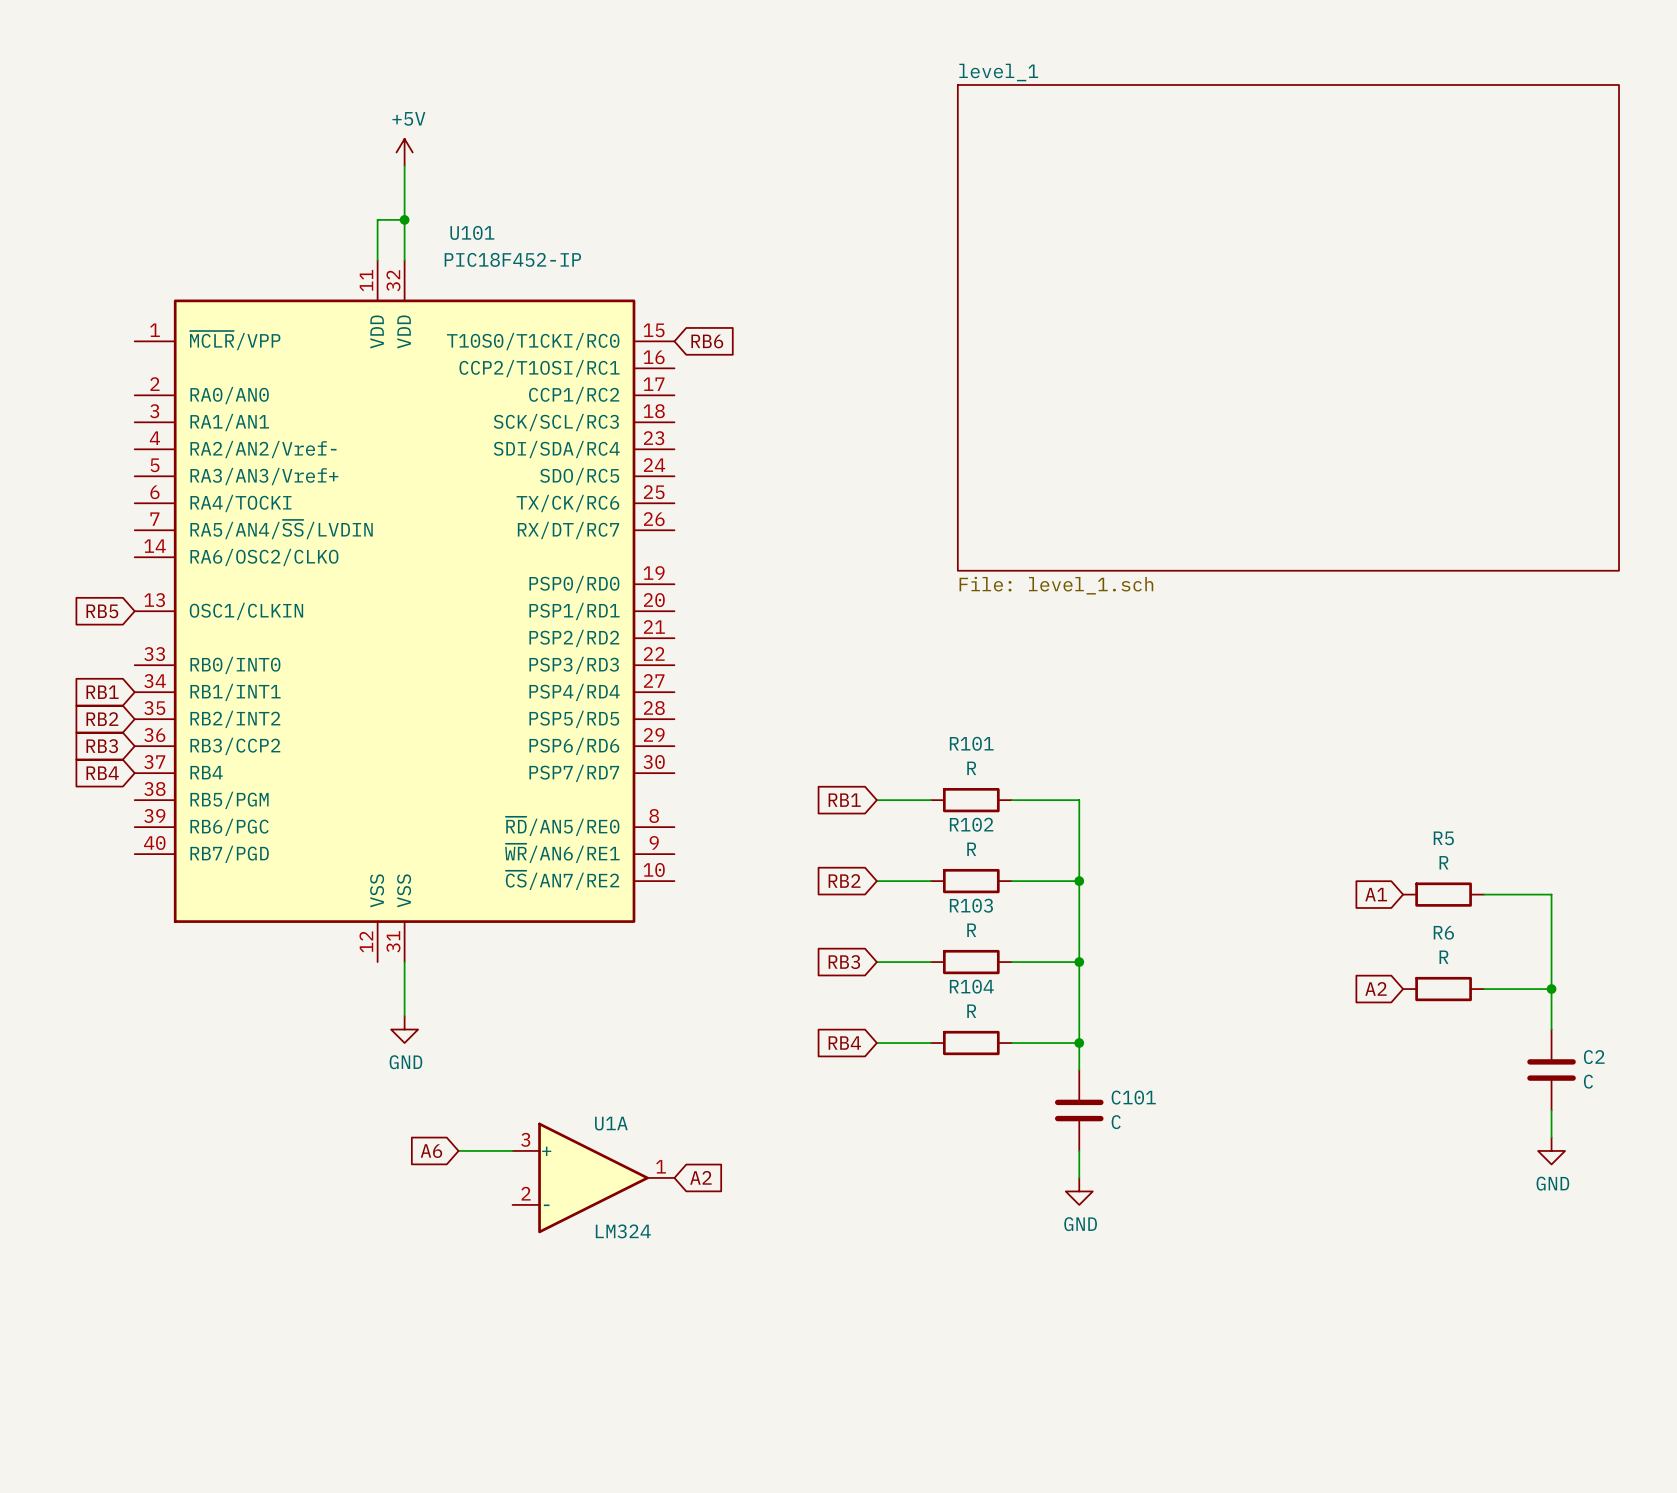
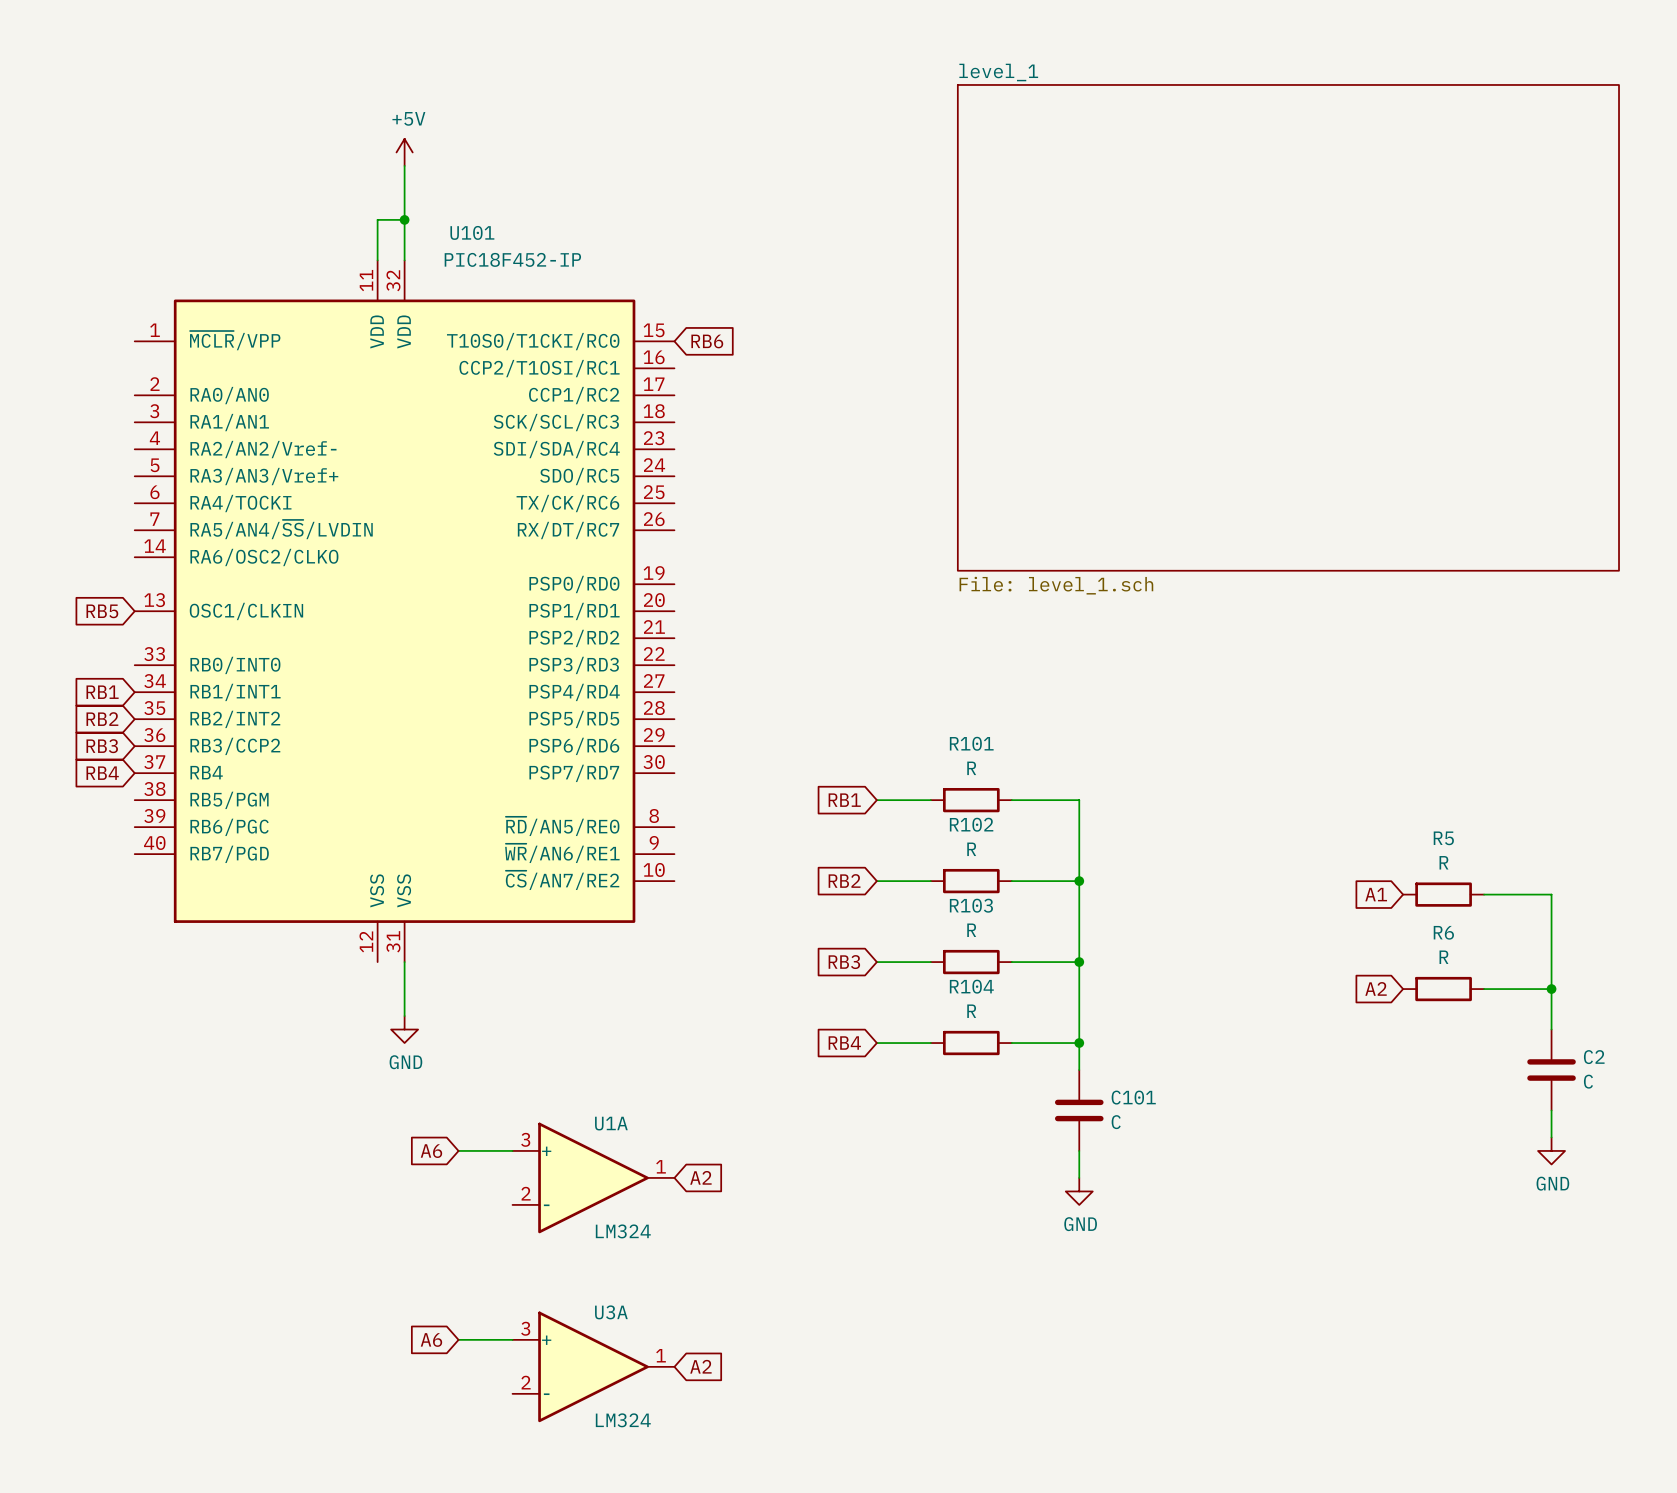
global label: none -> A6 (431, 1339)
wire: none -> (458, 1339) (512, 1339)
U3A: none -> LM324 (593, 1366)
global label: none -> A2 (700, 1366)

